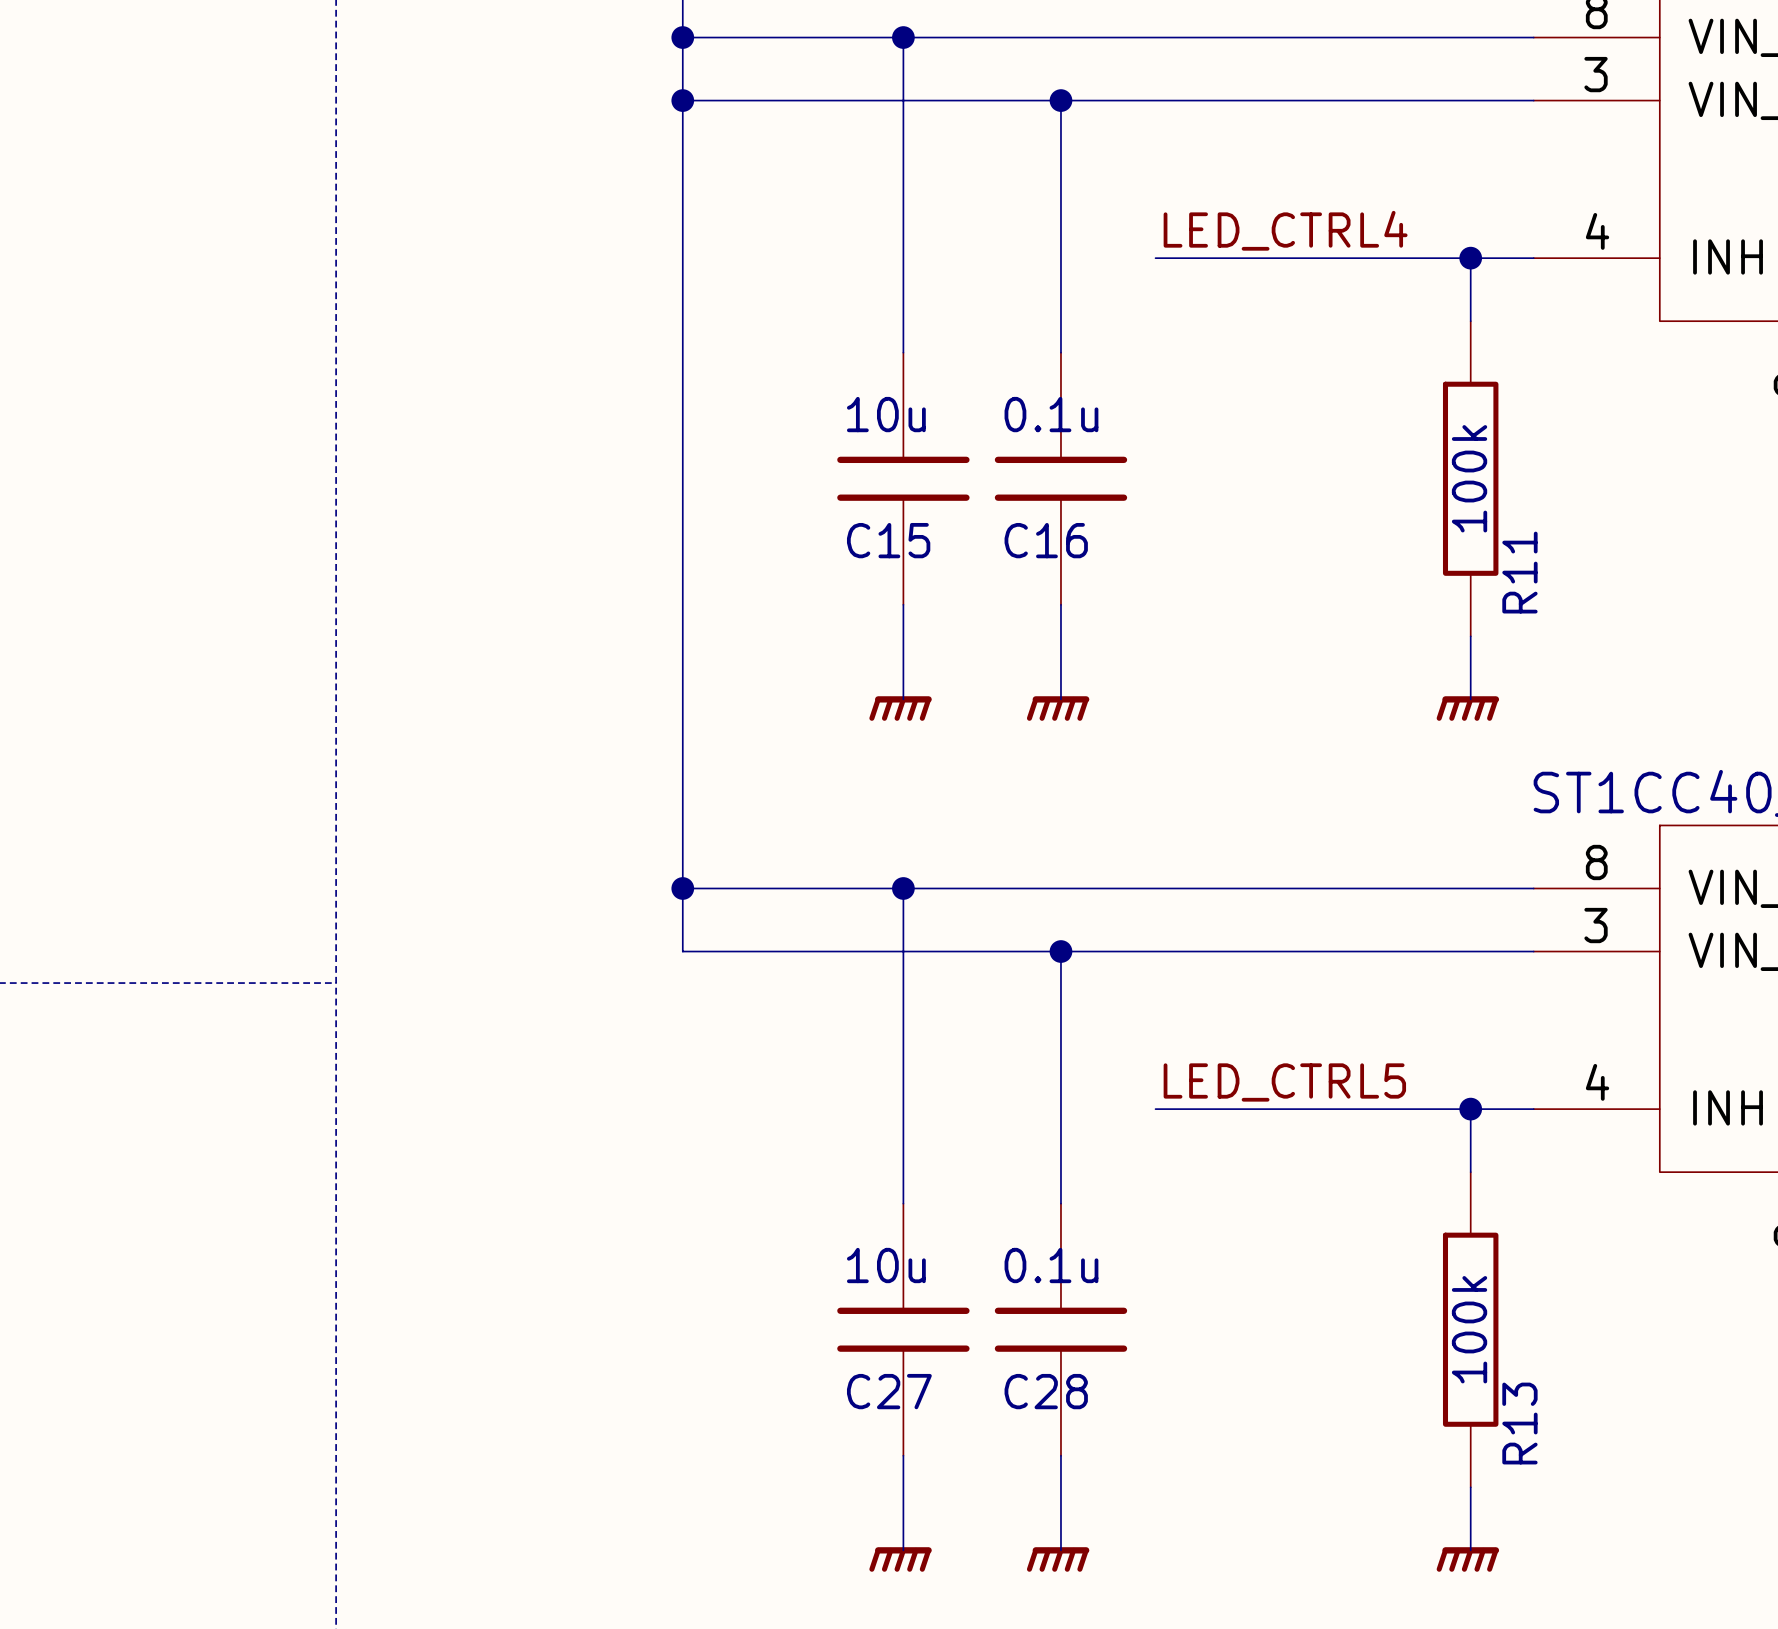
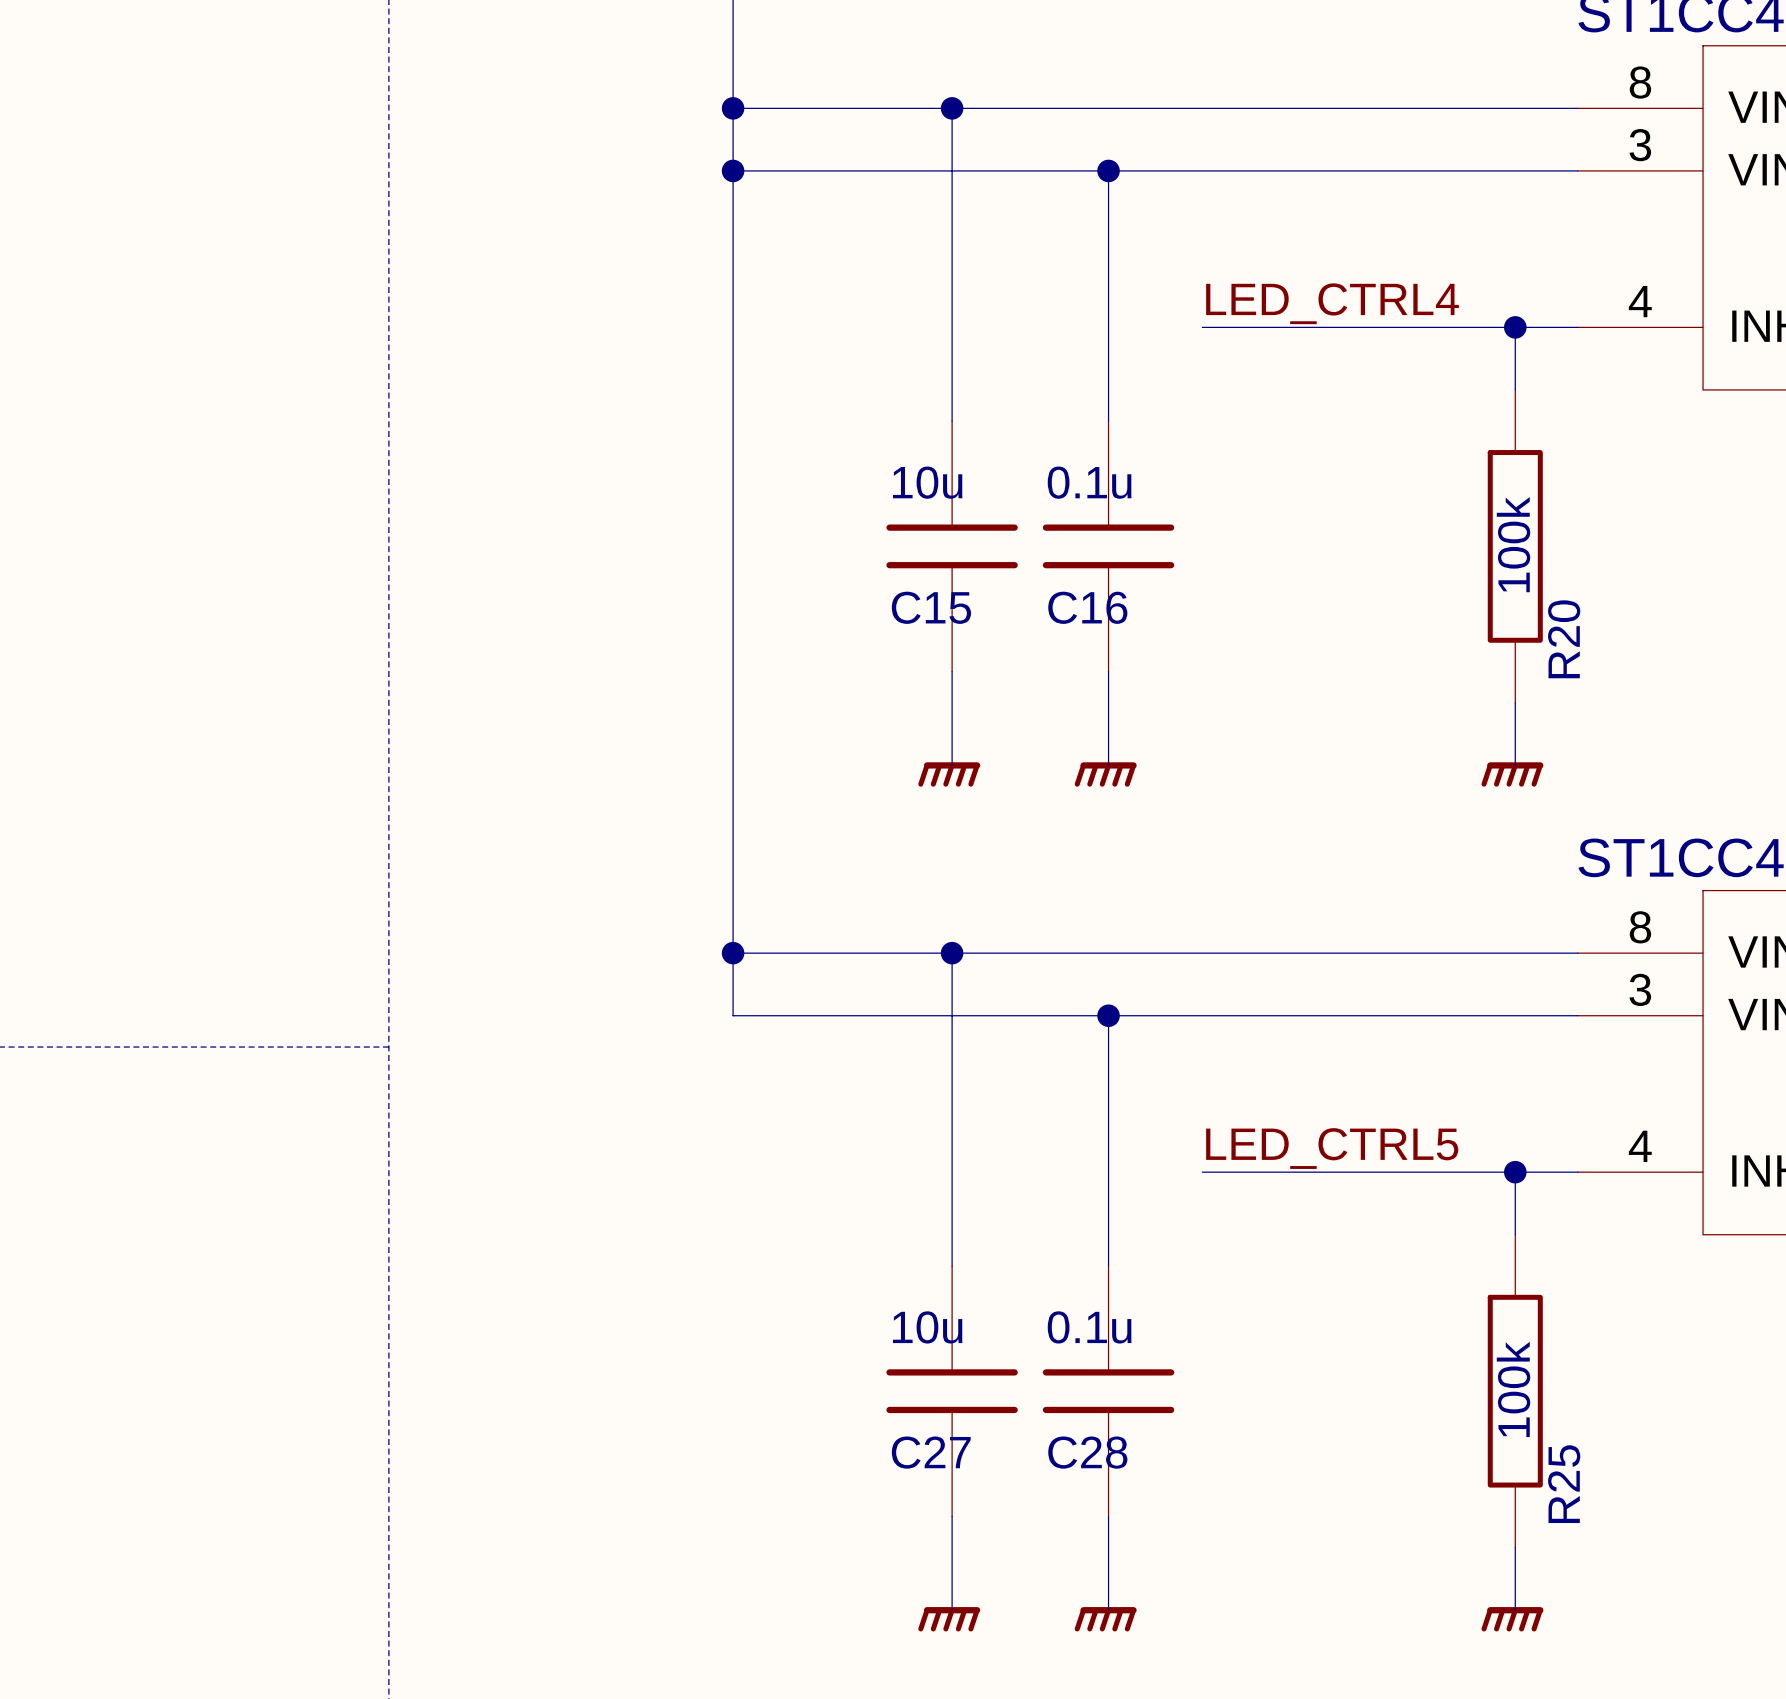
R11 name: R11 (1519, 572) -> R20 (1564, 639)
R13 name: R13 (1519, 1423) -> R25 (1564, 1484)

